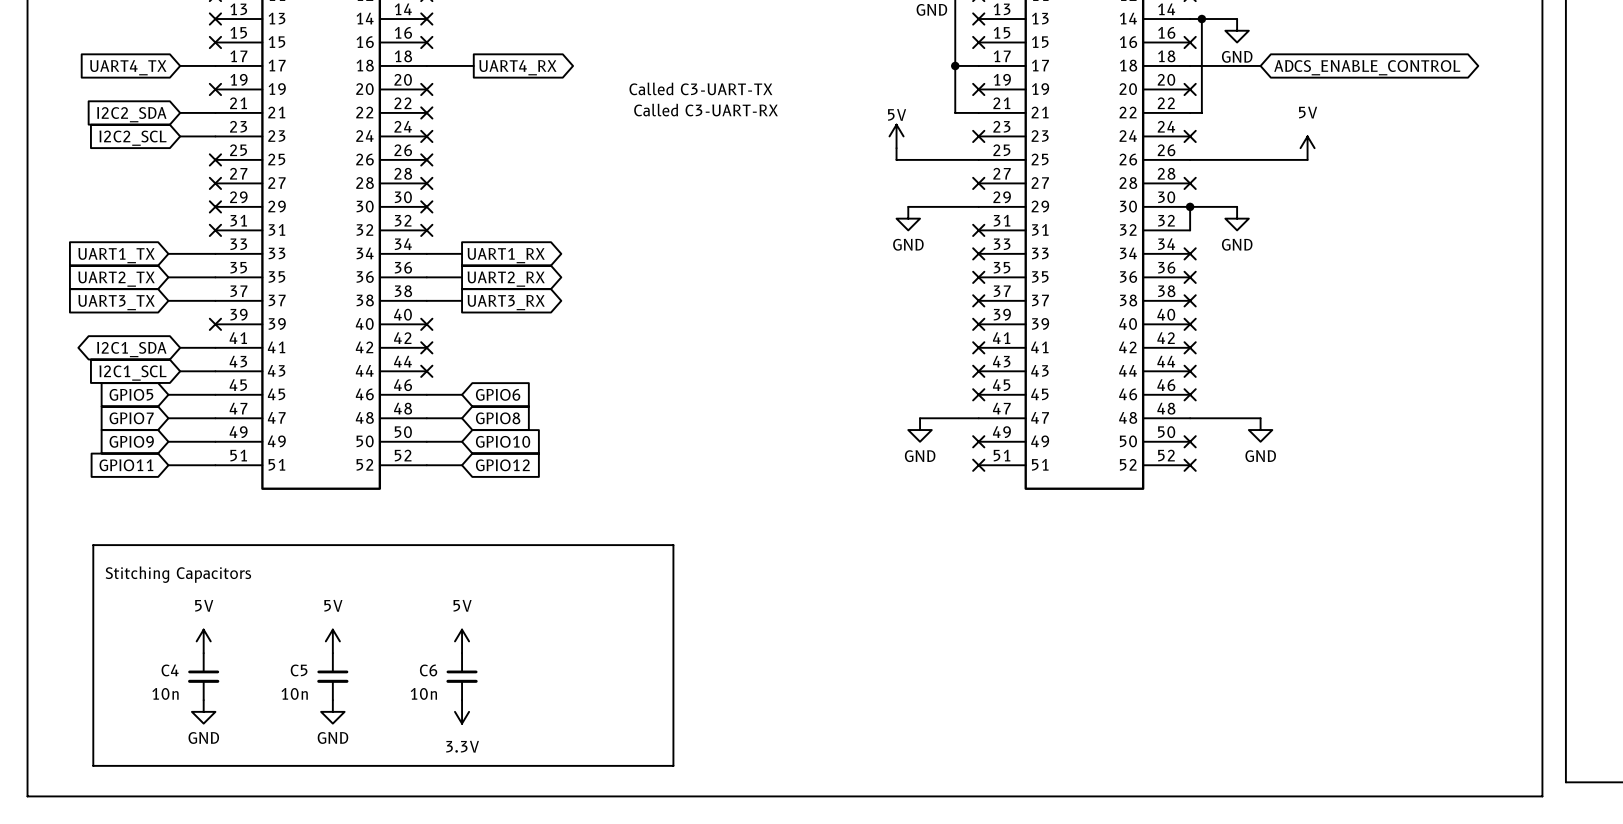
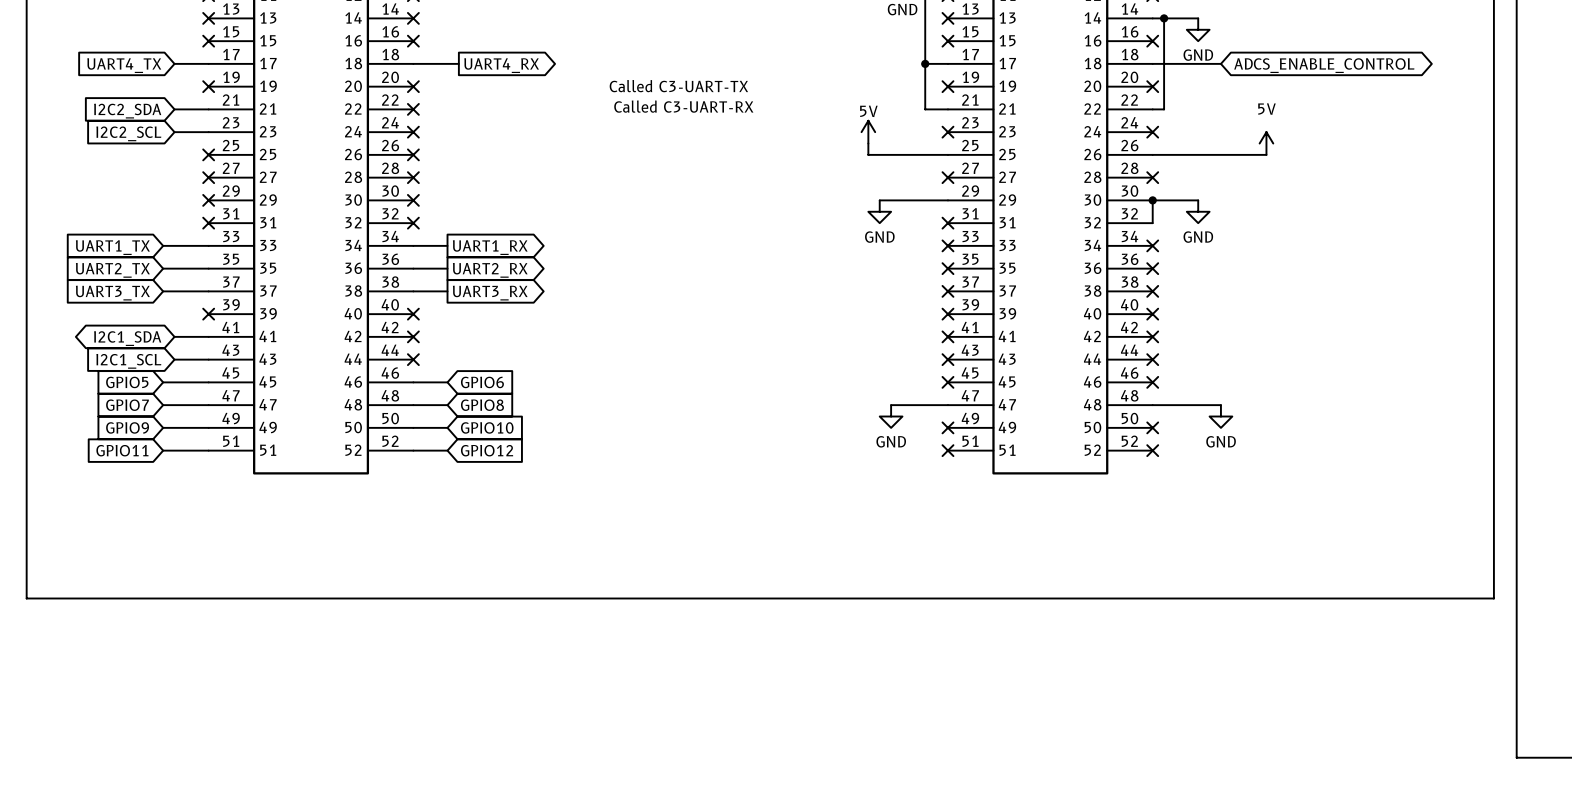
line: (93, 545) (673, 545) (673, 765) (93, 765) (93, 545) -> none
text: Stitching Capacitors (178, 574) -> none
line: (27, 617) (27, 796) (1542, 796) (1542, 617) -> (26, 598) (1493, 598)
power symbol: 5V (203, 641) -> none
power symbol: 5V (332, 641) -> none
power symbol: 5V (462, 641) -> none
C4: 10n (203, 676) -> none
C5: 10n (332, 676) -> none
C6: 10n (462, 676) -> none
power symbol: GND (203, 711) -> none
power symbol: GND (332, 711) -> none
power symbol: 3.3V (462, 711) -> none

